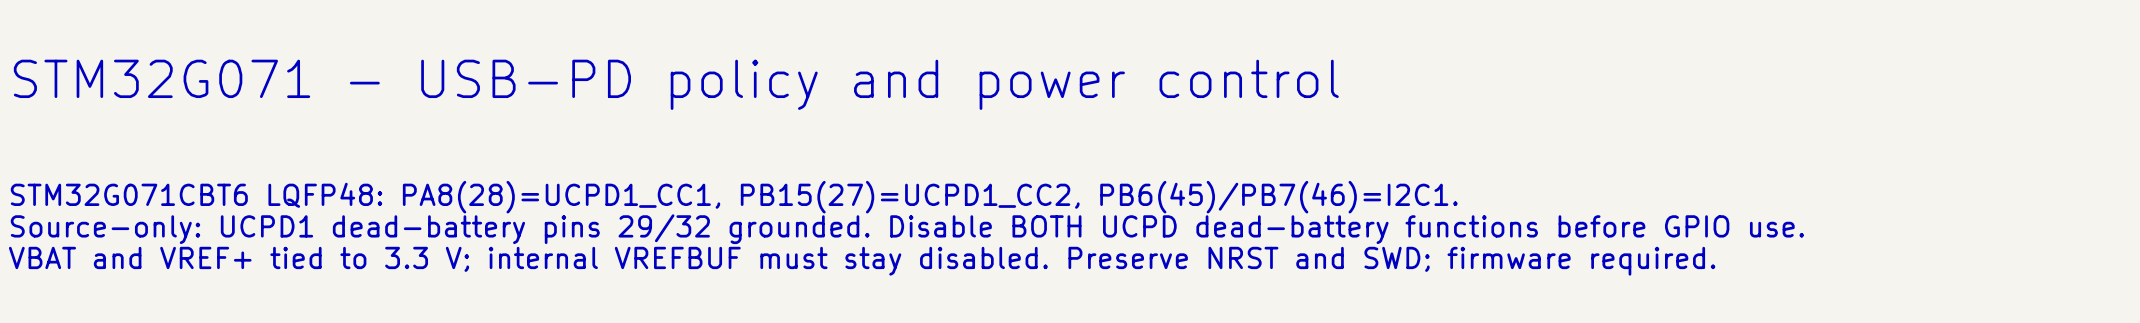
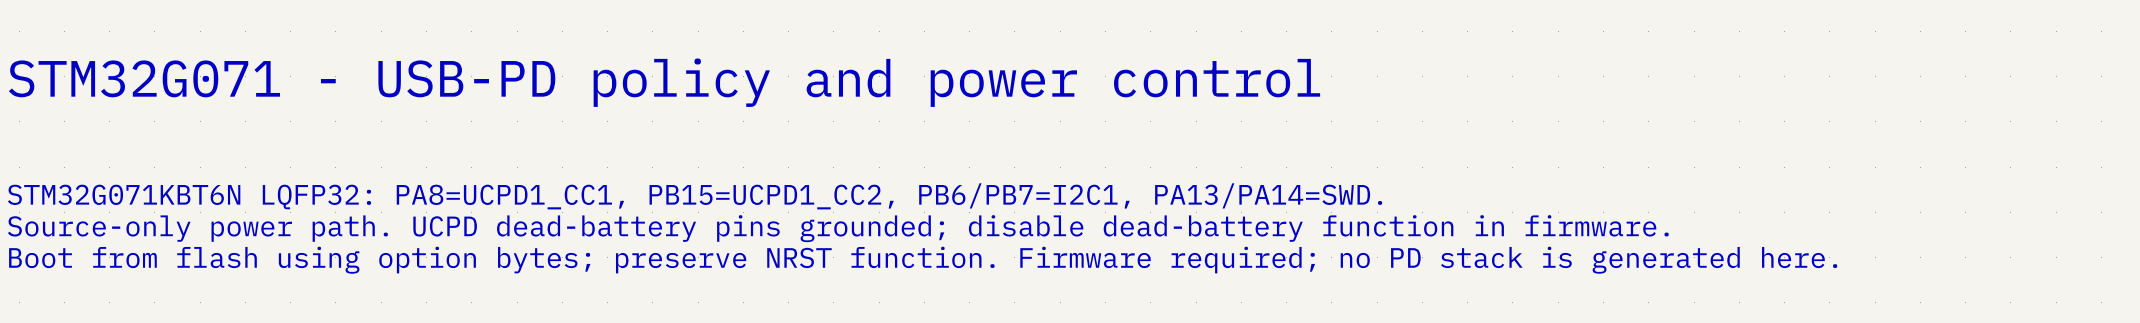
text: STM32G071CBT6 LQFP48: PA8(28)=UCPD1_CC1, PB15(27)=UCPD1_CC2, PB6(45)/PB7(46)=I2C1. (734, 197) -> STM32G071KBT6N LQFP32: PA8=UCPD1_CC1, PB15=UCPD1_CC2, PB6/PB7=I2C1, PA13/PA14=SWD. (695, 196)
text: Source-only: UCPD1 dead-battery pins 29/32 grounded. Disable BOTH UCPD dead-battery functions before GPIO use. (907, 229) -> Source-only power path. UCPD dead-battery pins grounded; disable dead-battery function in firmware. (838, 228)
text: VBAT and VREF+ tied to 3.3 V; internal VREFBUF must stay disabled. Preserve NRST and SWD; firmware required. (862, 261) -> Boot from flash using option bytes; preserve NRST function. Firmware required; no PD stack is generated here. (923, 260)

